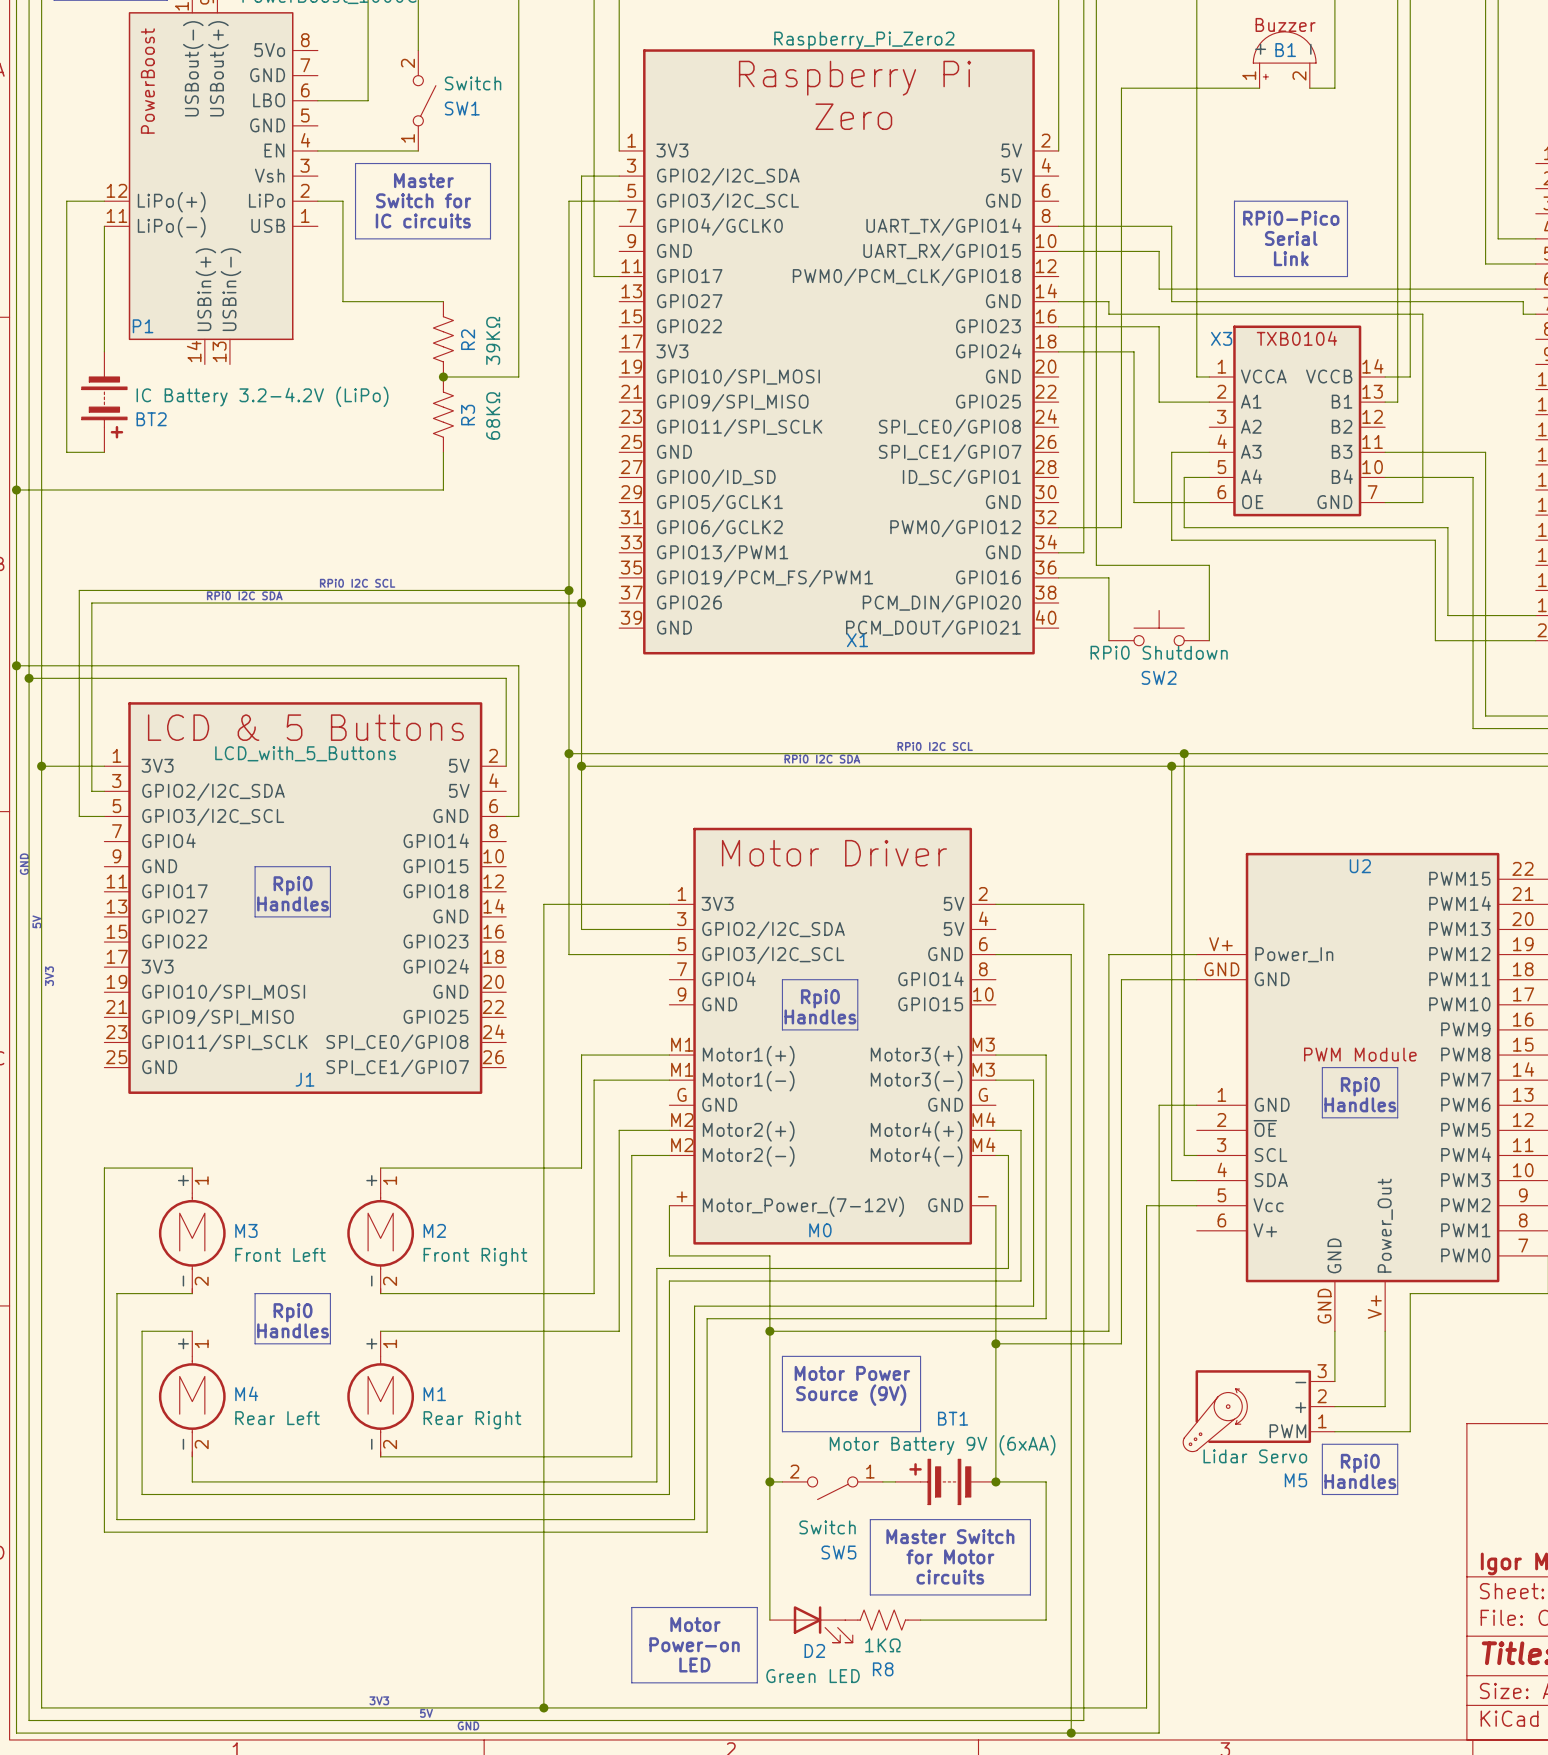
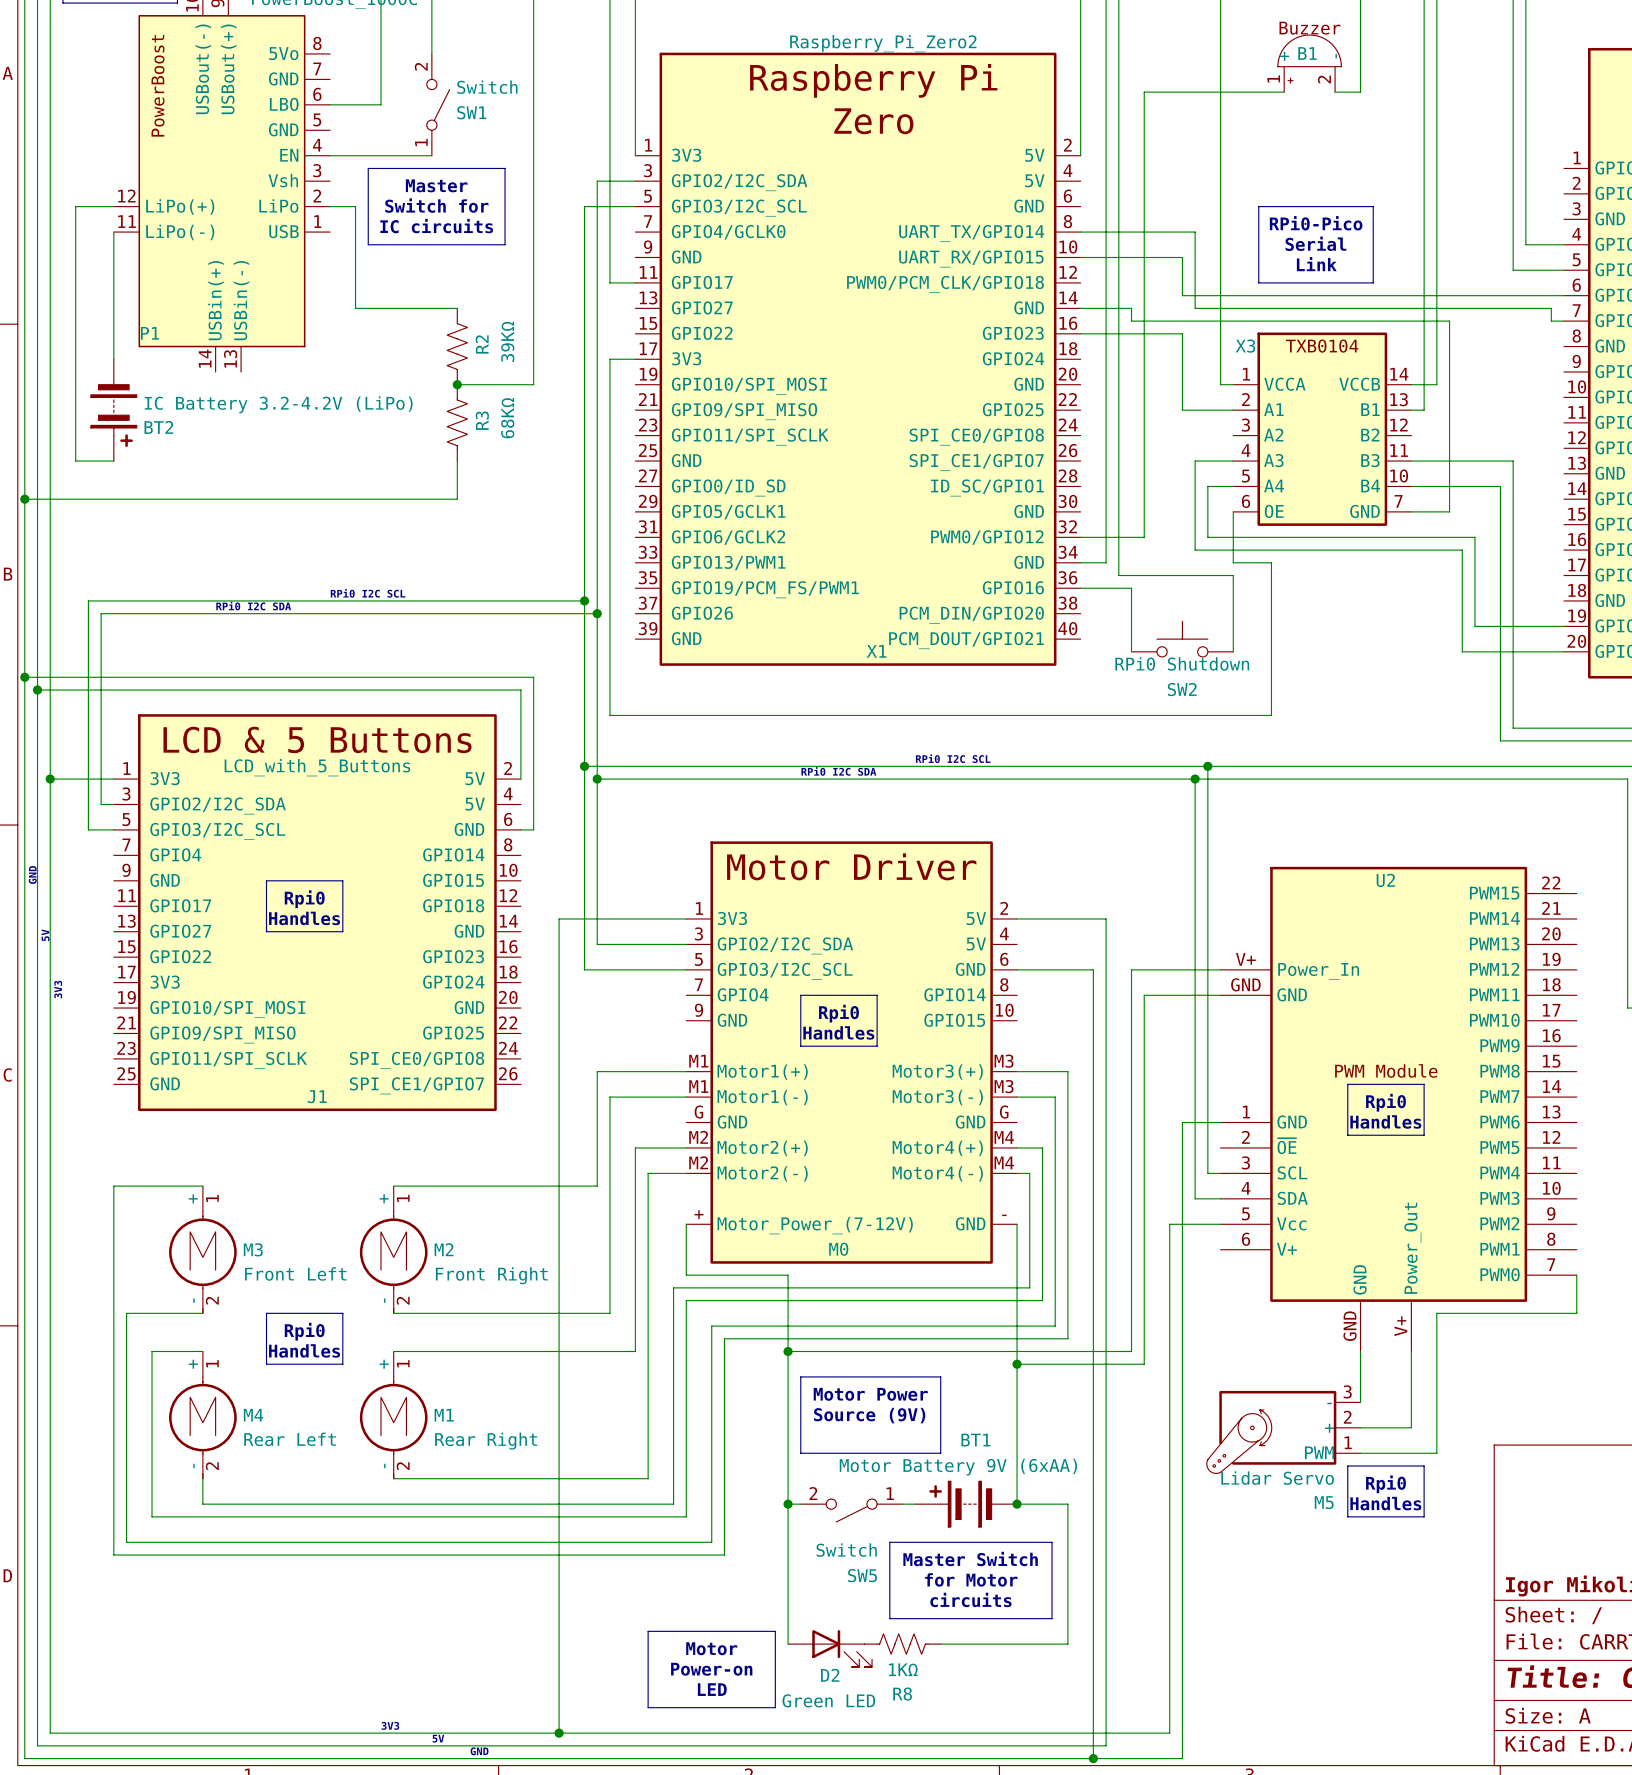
wire: (1058, 351) (1134, 351) (1134, 502) (1209, 502) -> (635, 359) (609, 359) (609, 715) (1271, 715) (1271, 562) (1233, 562) (1233, 511)

